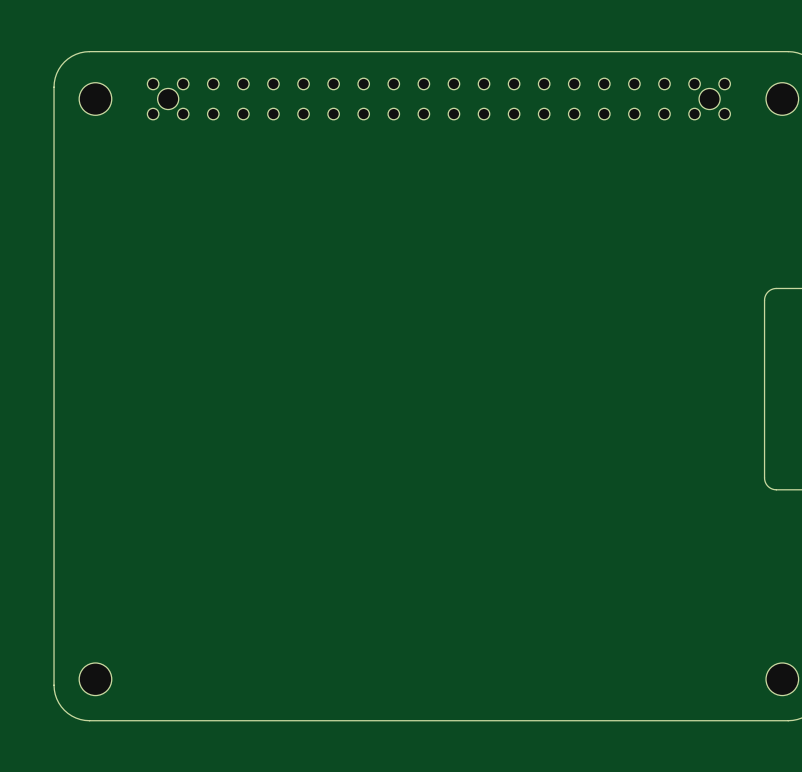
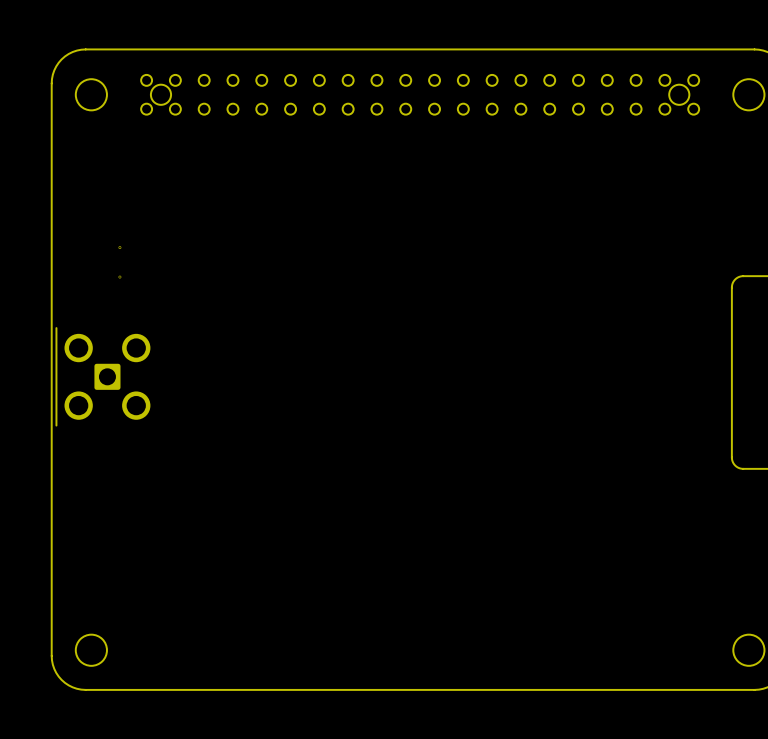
part: none -> (119, 262)
part: none -> (103, 376)

